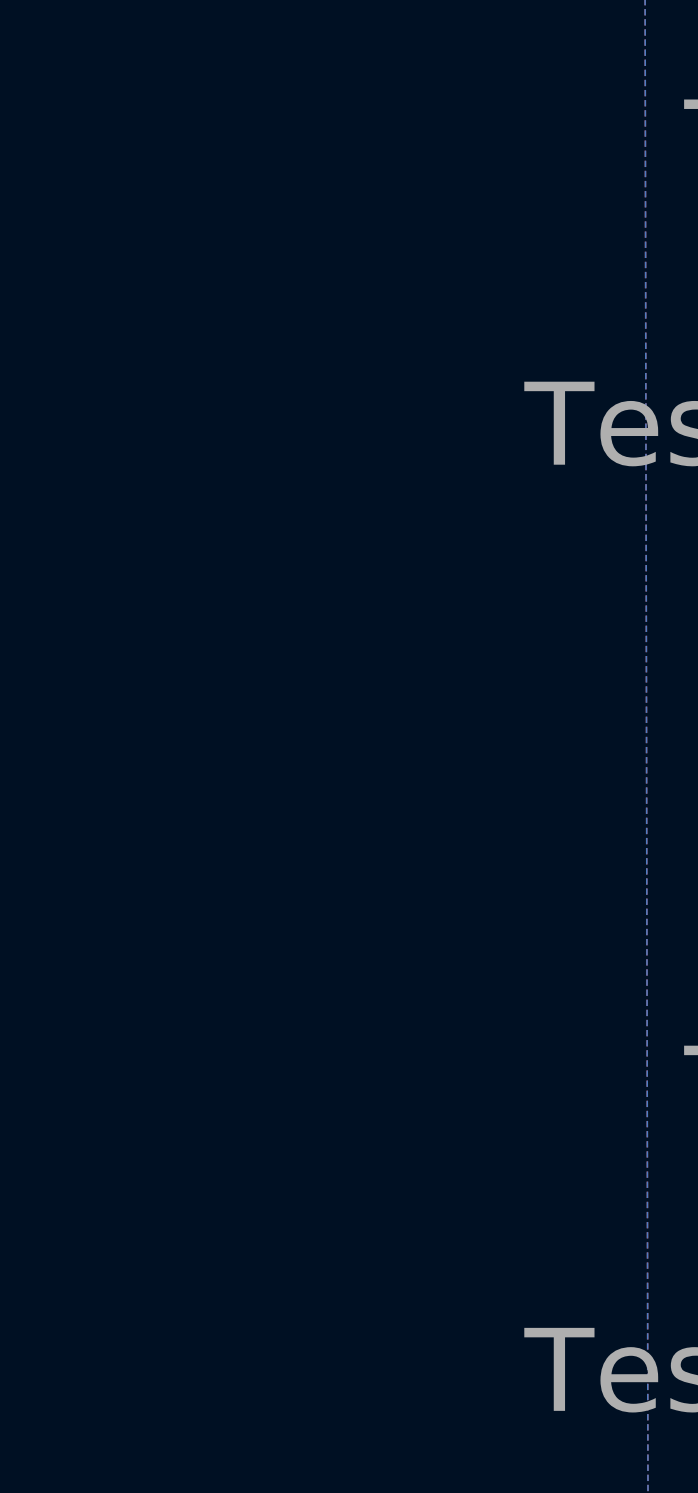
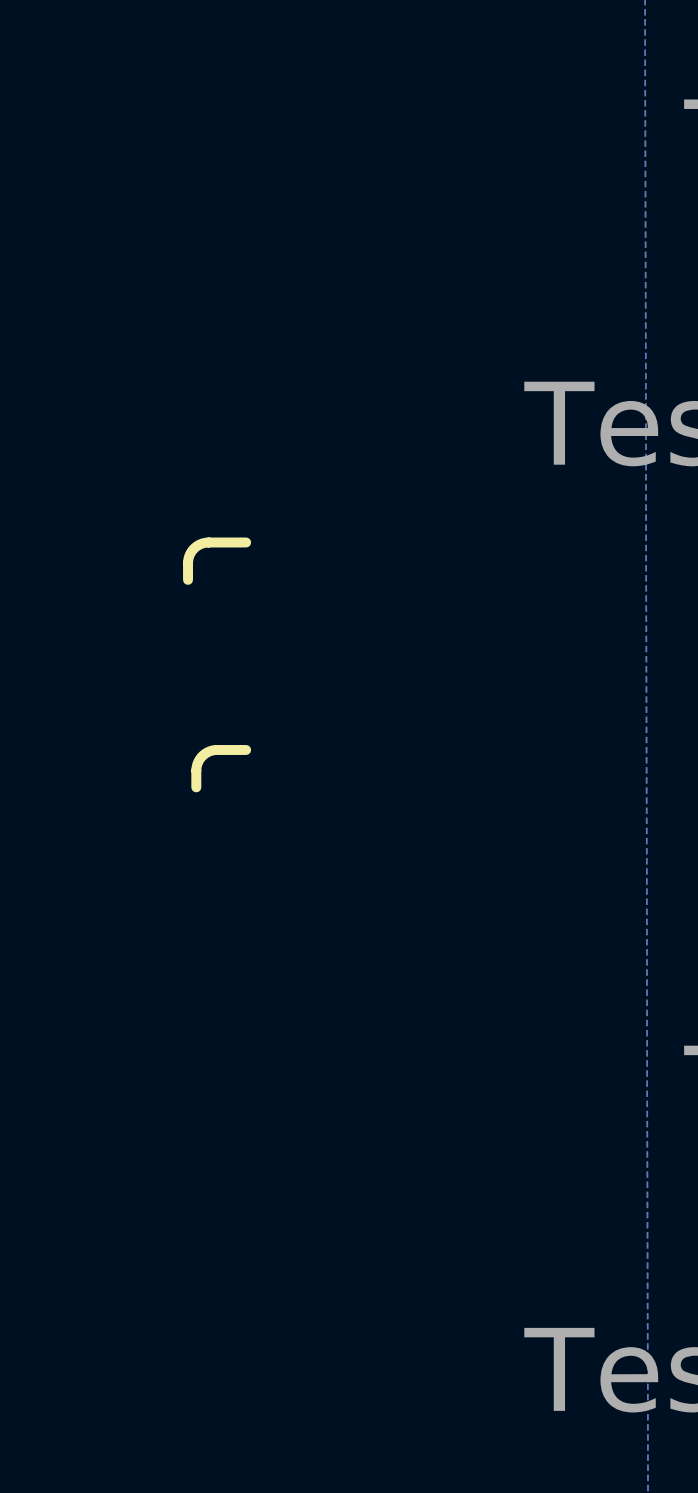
line: none -> (246, 542) (206, 542) (197, 545) (192, 550) (188, 558) (188, 579)
line: none -> (246, 749) (214, 750) (204, 754) (196, 766) (196, 787)

